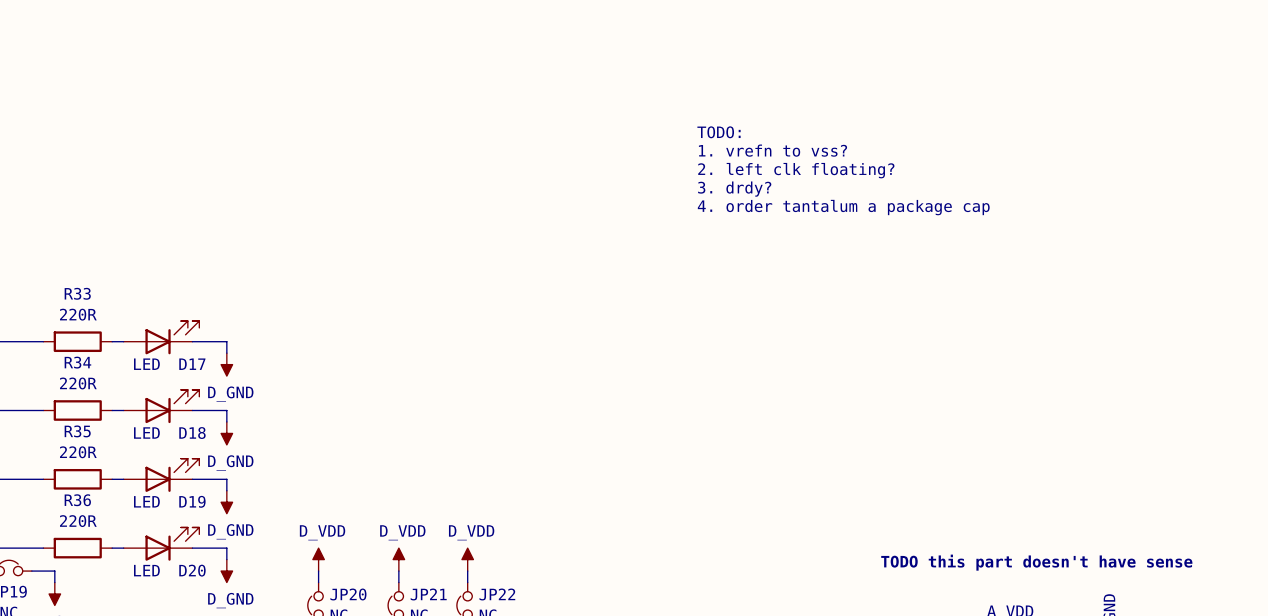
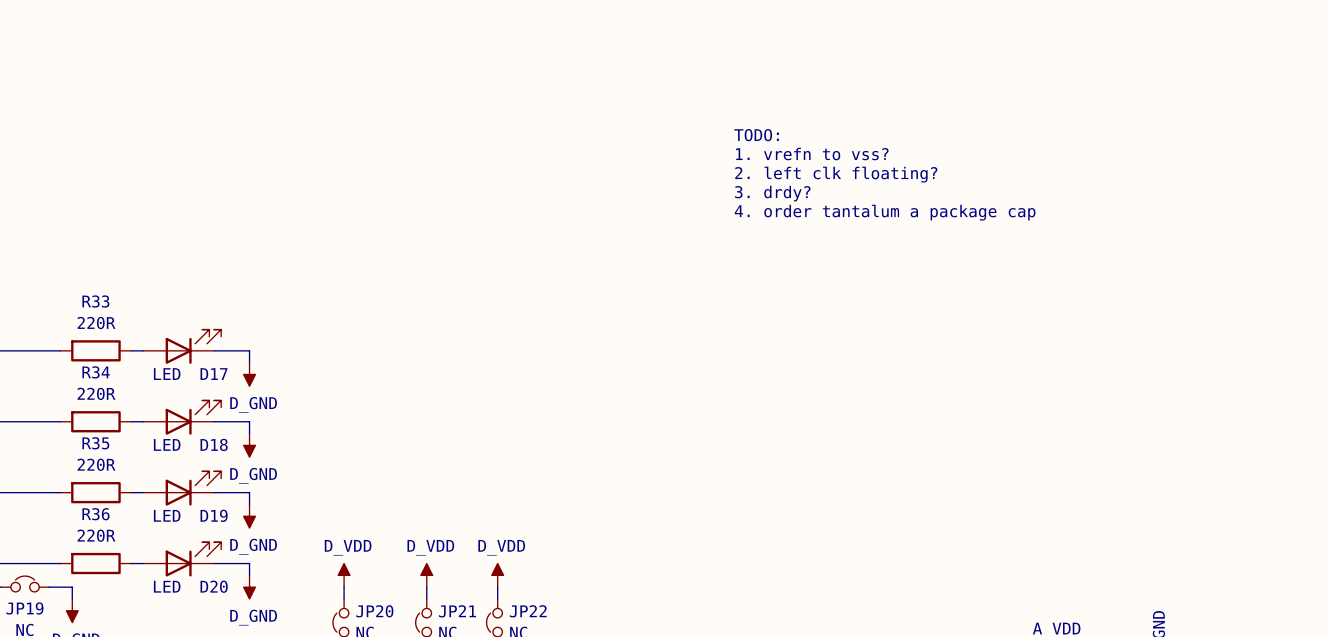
text: TODO this part doesn't have sense (1036, 562) -> none

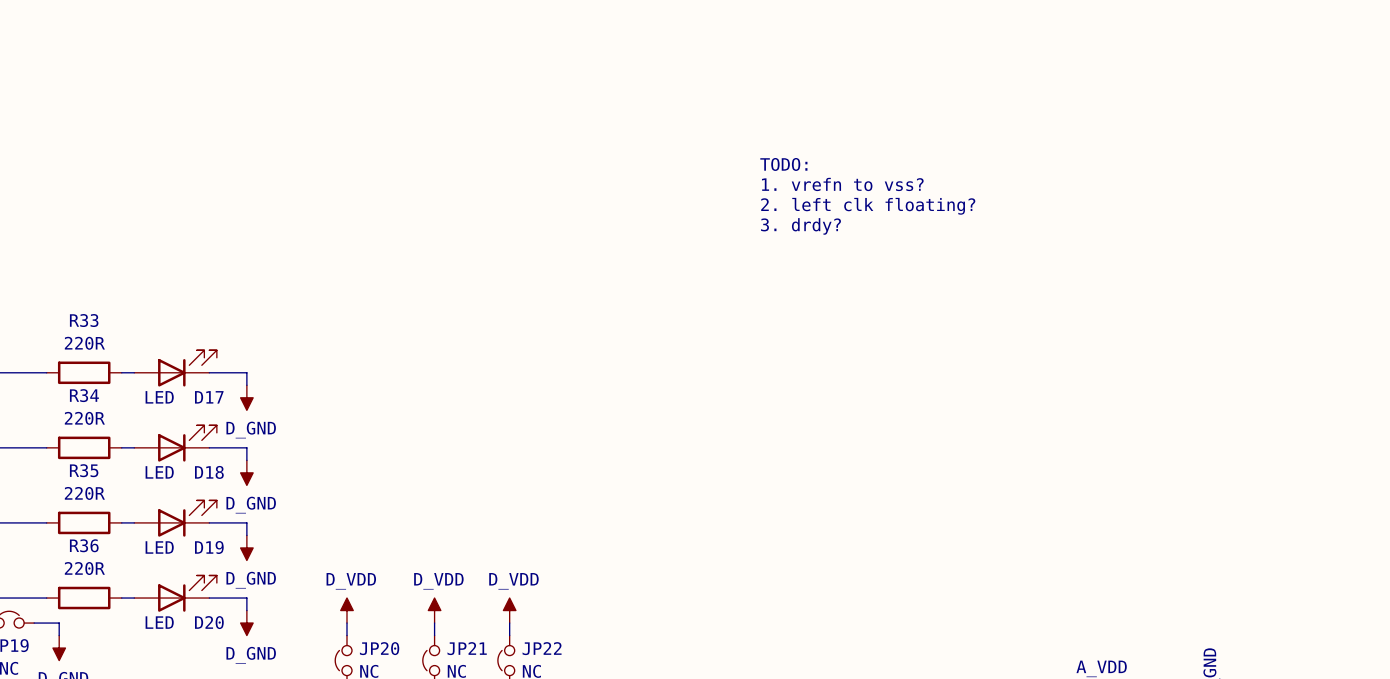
text: TODO: (756, 135) -> none
text: 1. vrefn to vss? (812, 154) -> TODO: (783, 164)
text: 2. left clk floating? (836, 174) -> 1. vrefn to vss? (842, 184)
text: 3. drdy? (772, 193) -> 2. left clk floating? (868, 206)
text: 4. order tantalum a package cap (885, 212) -> 3. drdy? (801, 226)

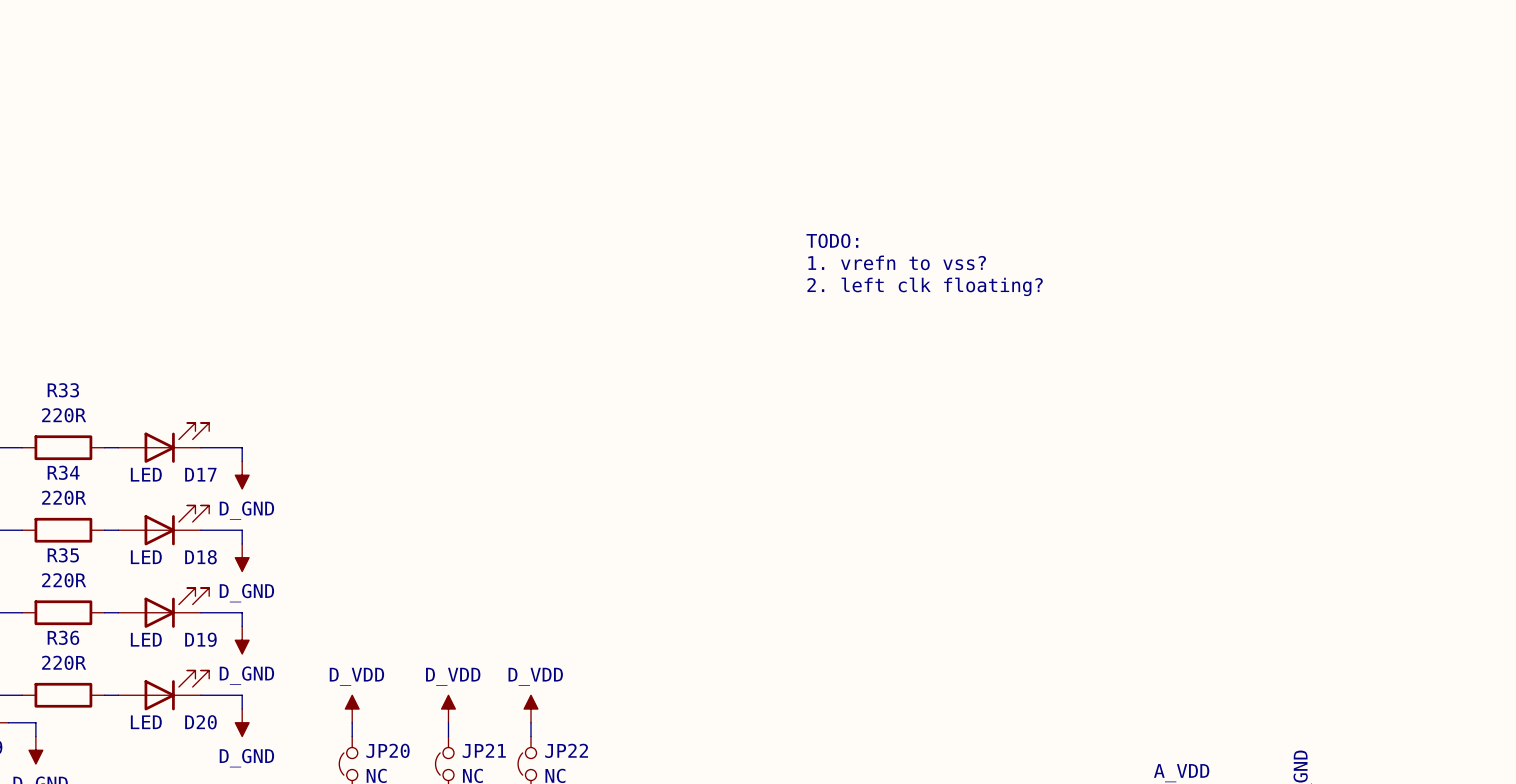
text: TODO: (783, 164) -> none
text: 1. vrefn to vss? (842, 184) -> TODO: (832, 240)
text: 2. left clk floating? (868, 206) -> 1. vrefn to vss? (897, 262)
text: 3. drdy? (801, 226) -> 2. left clk floating? (925, 286)

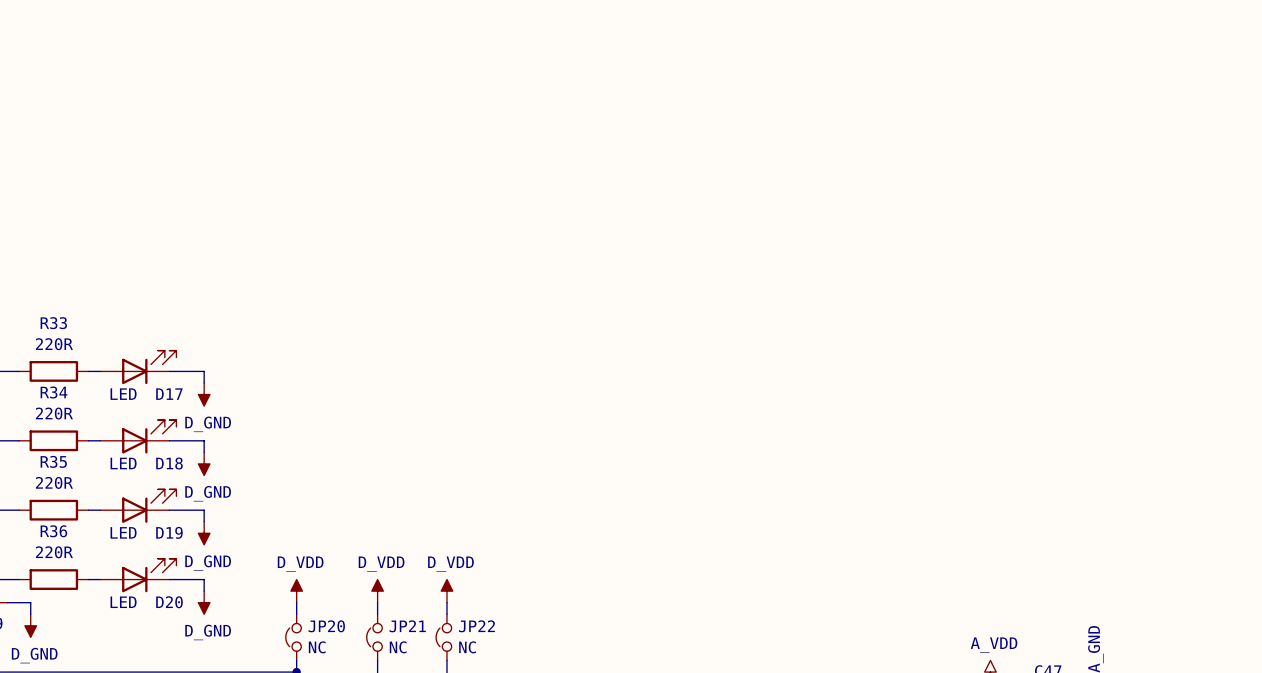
text: TODO: (832, 240) -> none
text: 1. vrefn to vss? (897, 262) -> none
text: 2. left clk floating? (925, 286) -> none

